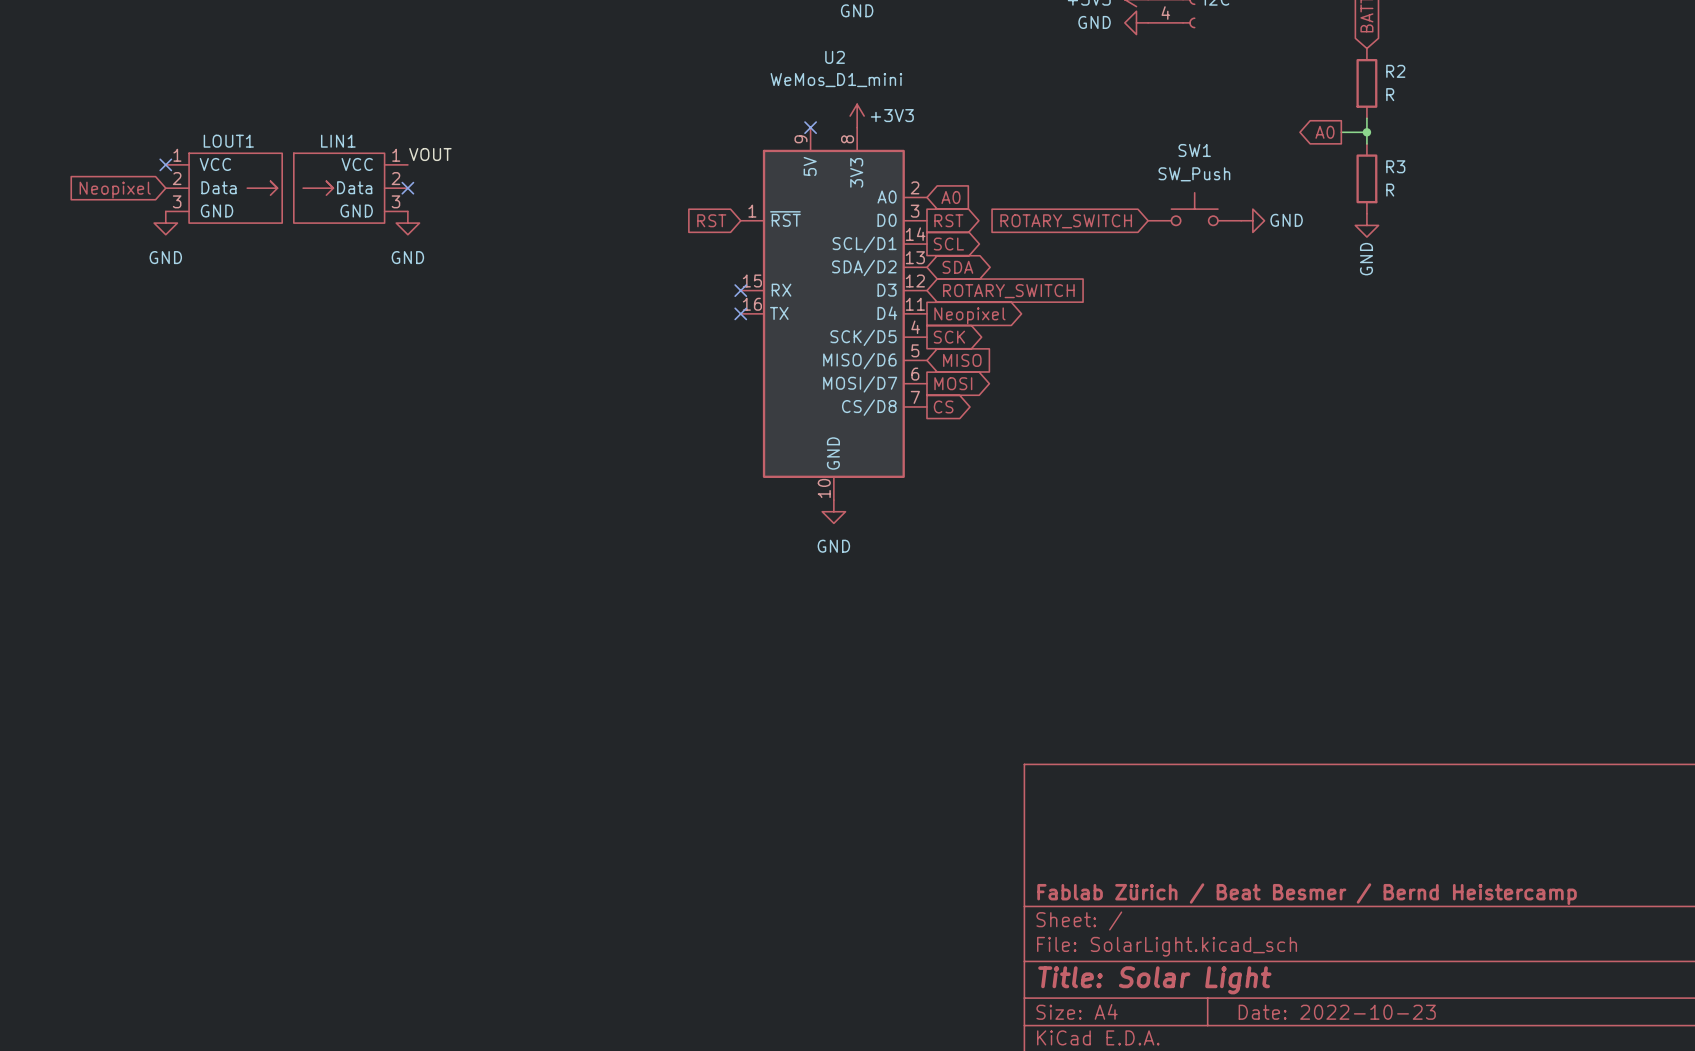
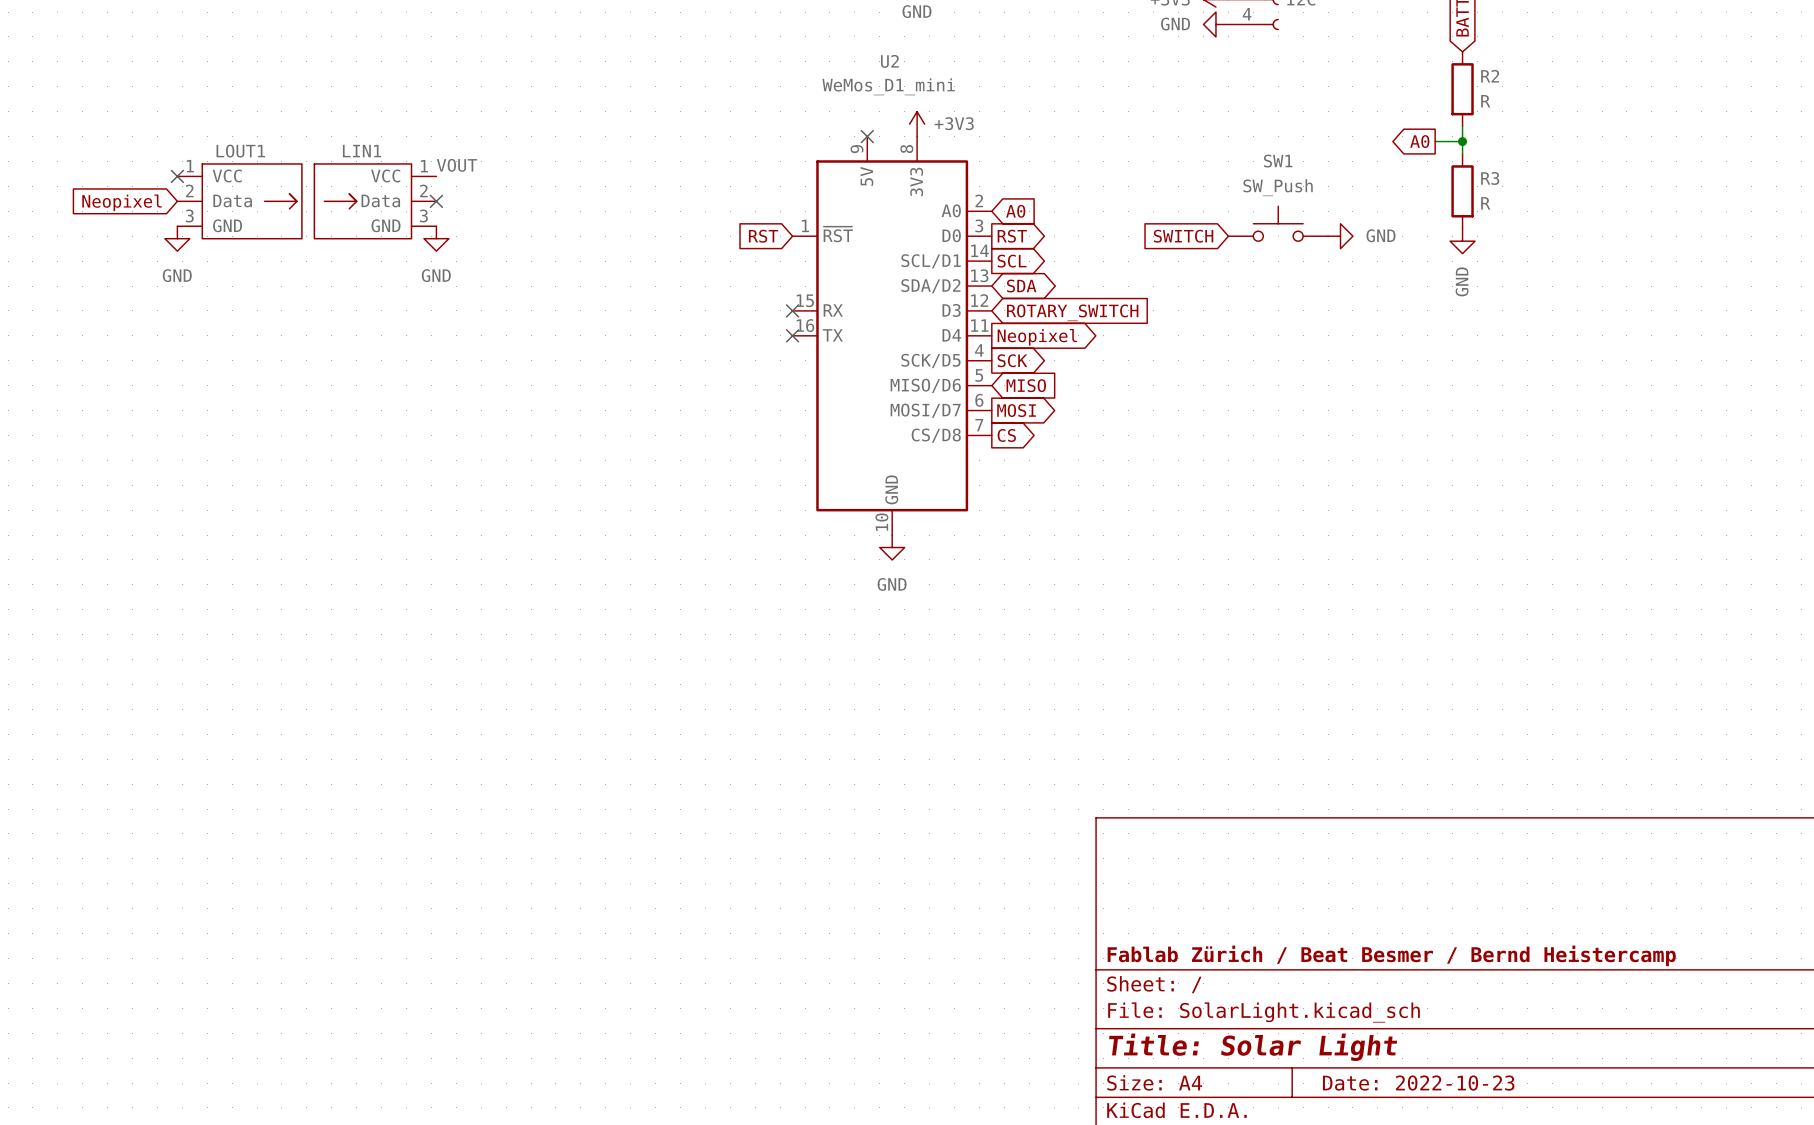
global label: ROTARY_SWITCH (1066, 221) -> SWITCH (1183, 236)

